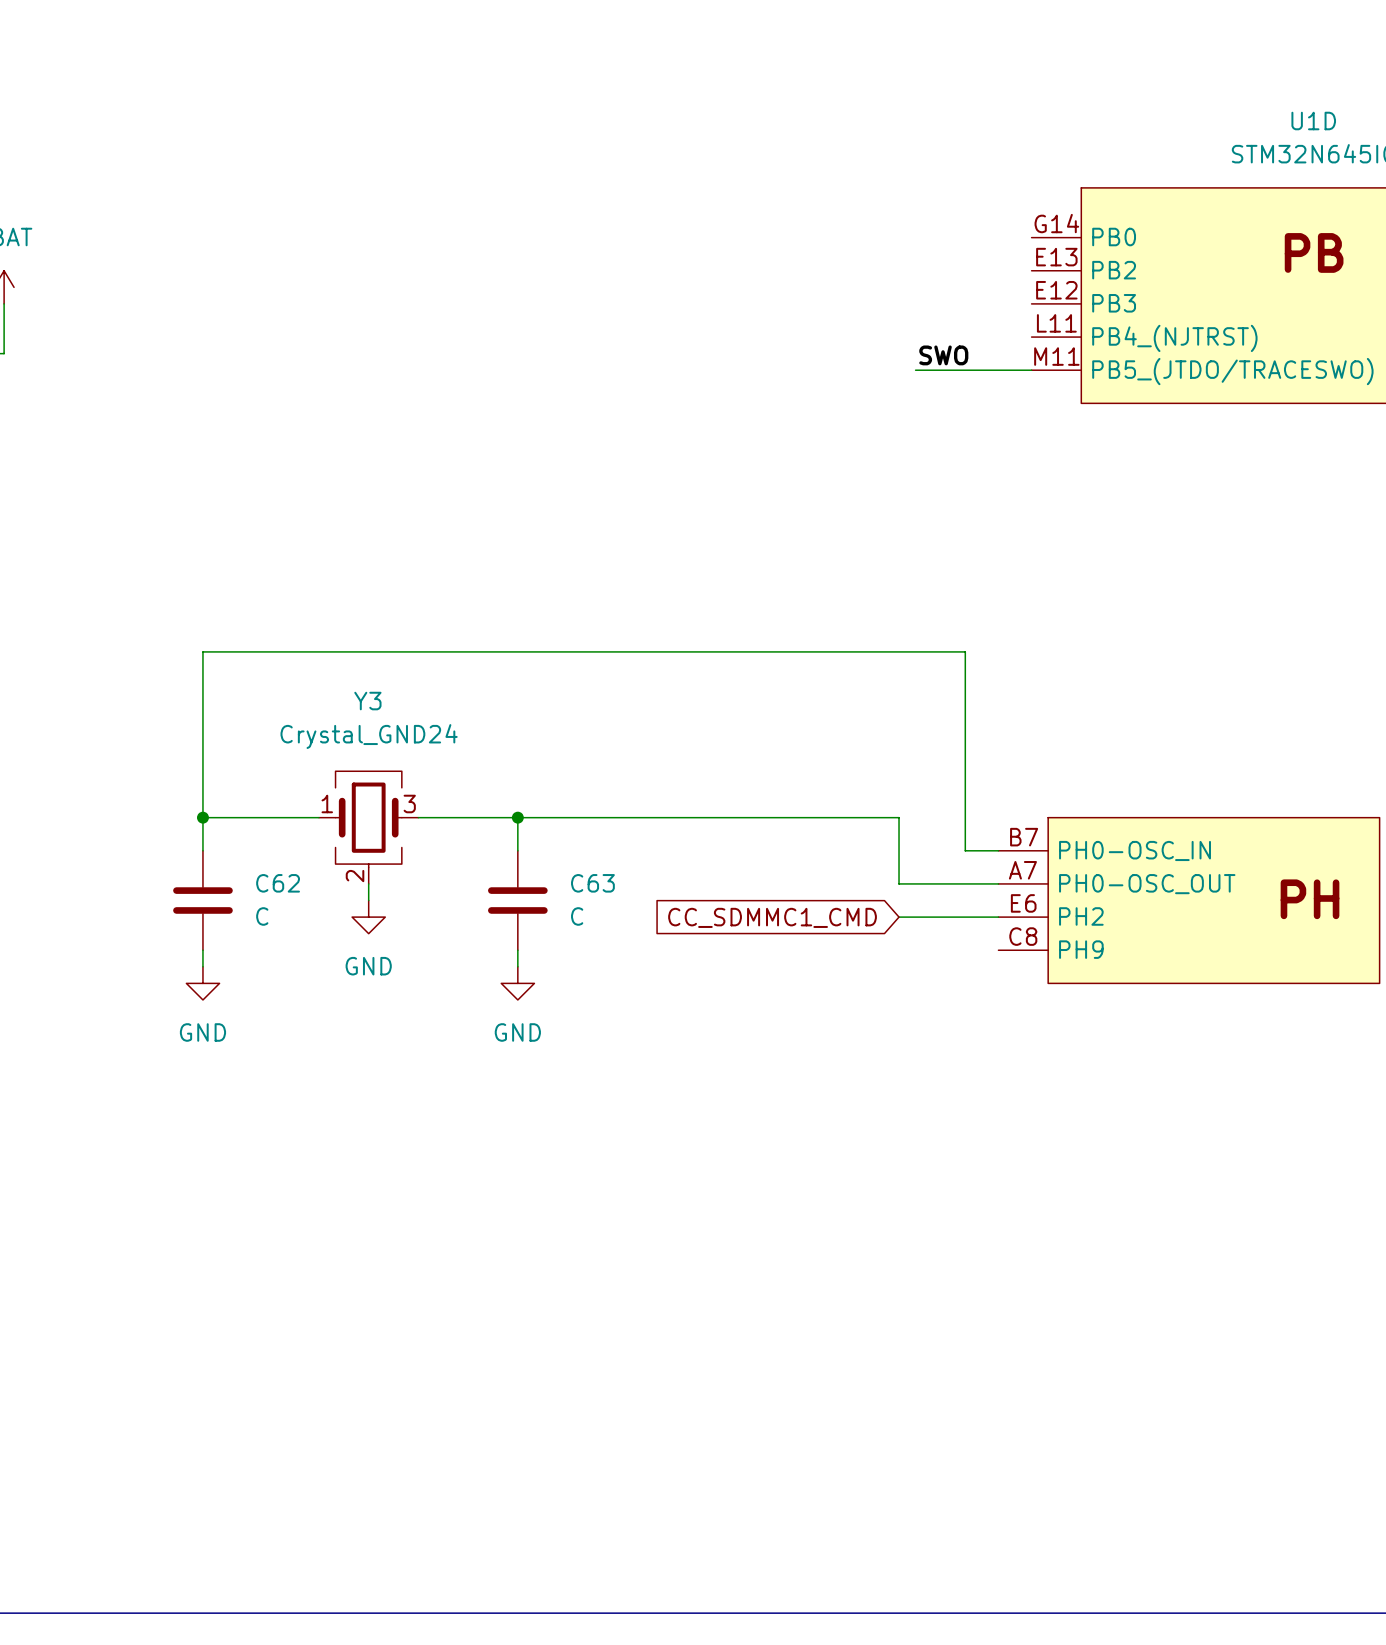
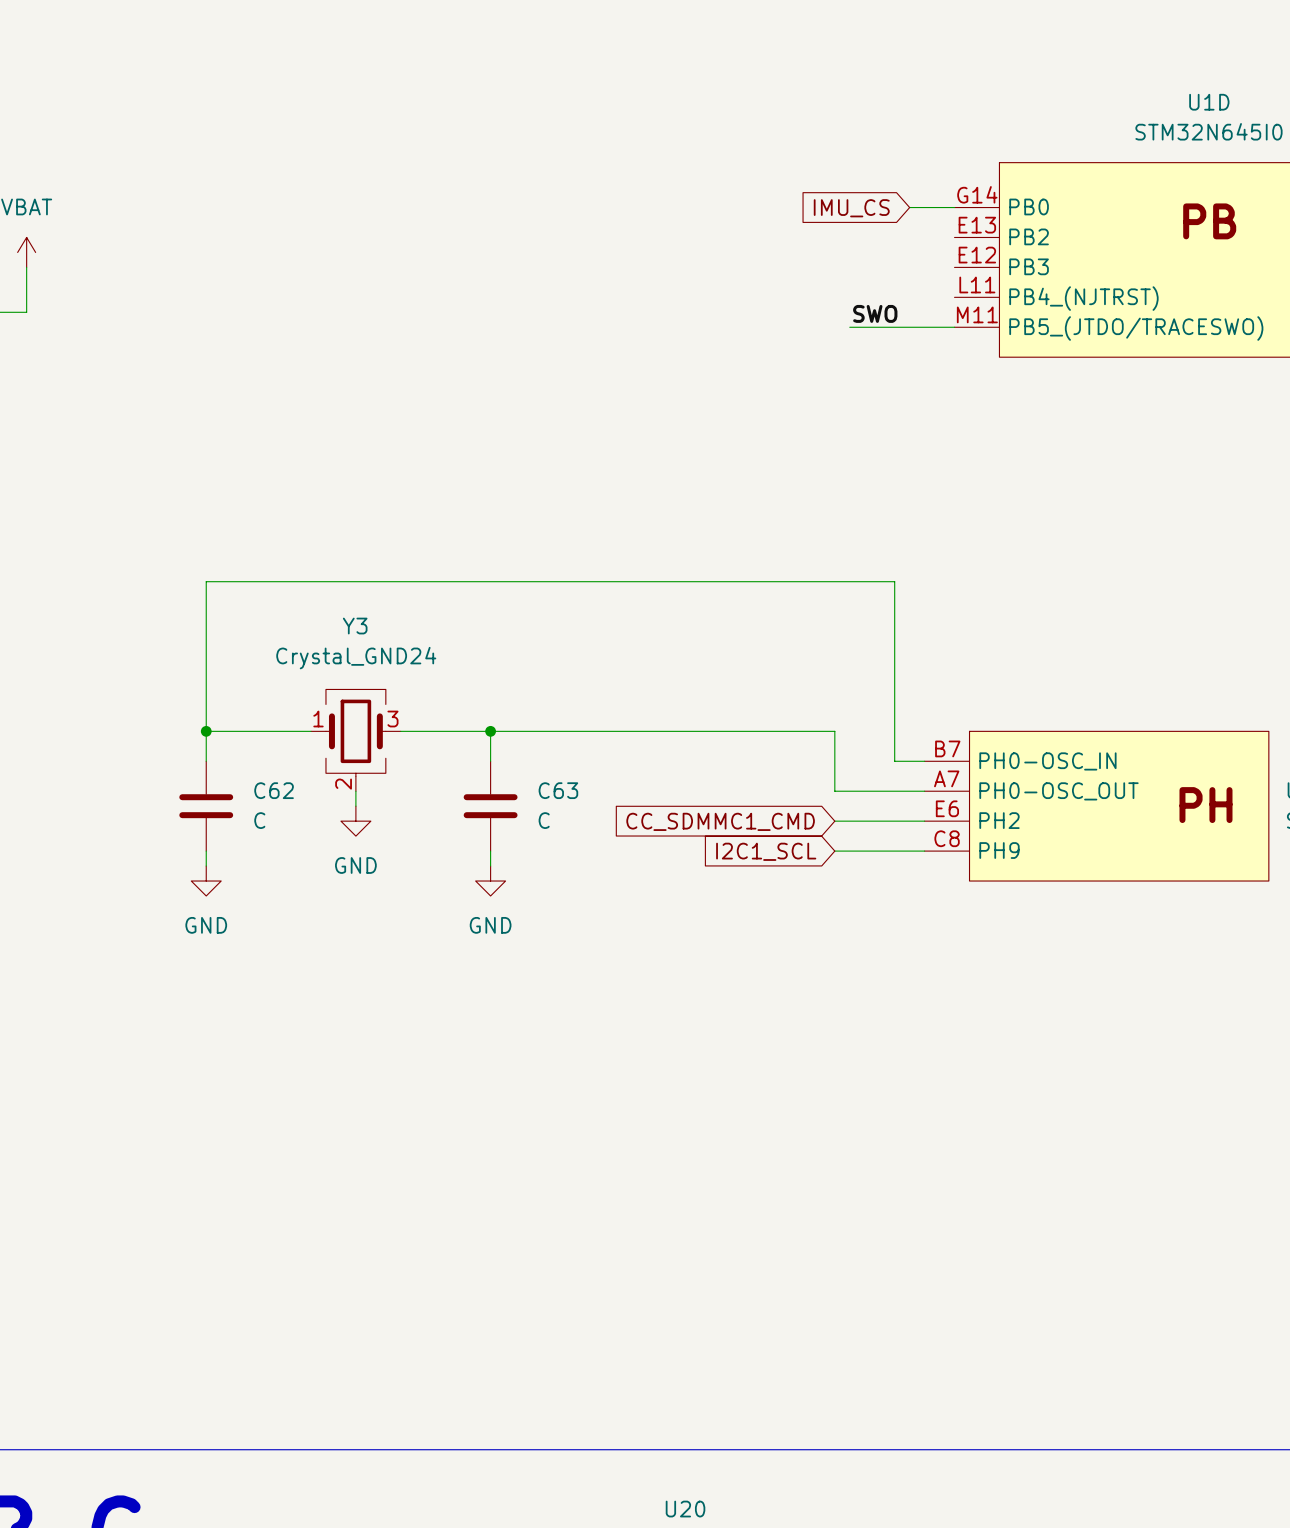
wire: none -> (909, 207) (954, 207)
global label: none -> IMU_CS (851, 208)
wire: none -> (834, 851) (924, 851)
global label: none -> I2C1_SCL (766, 851)

